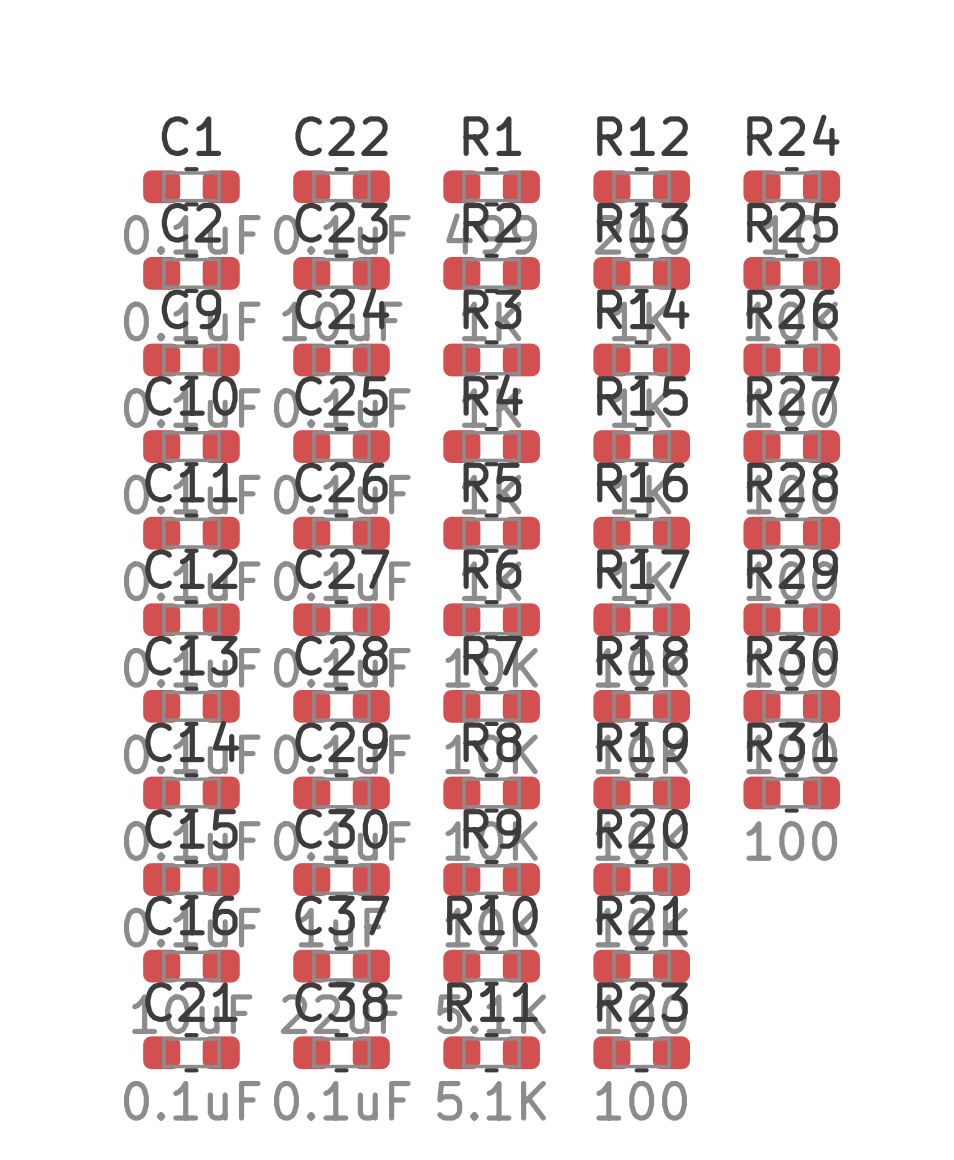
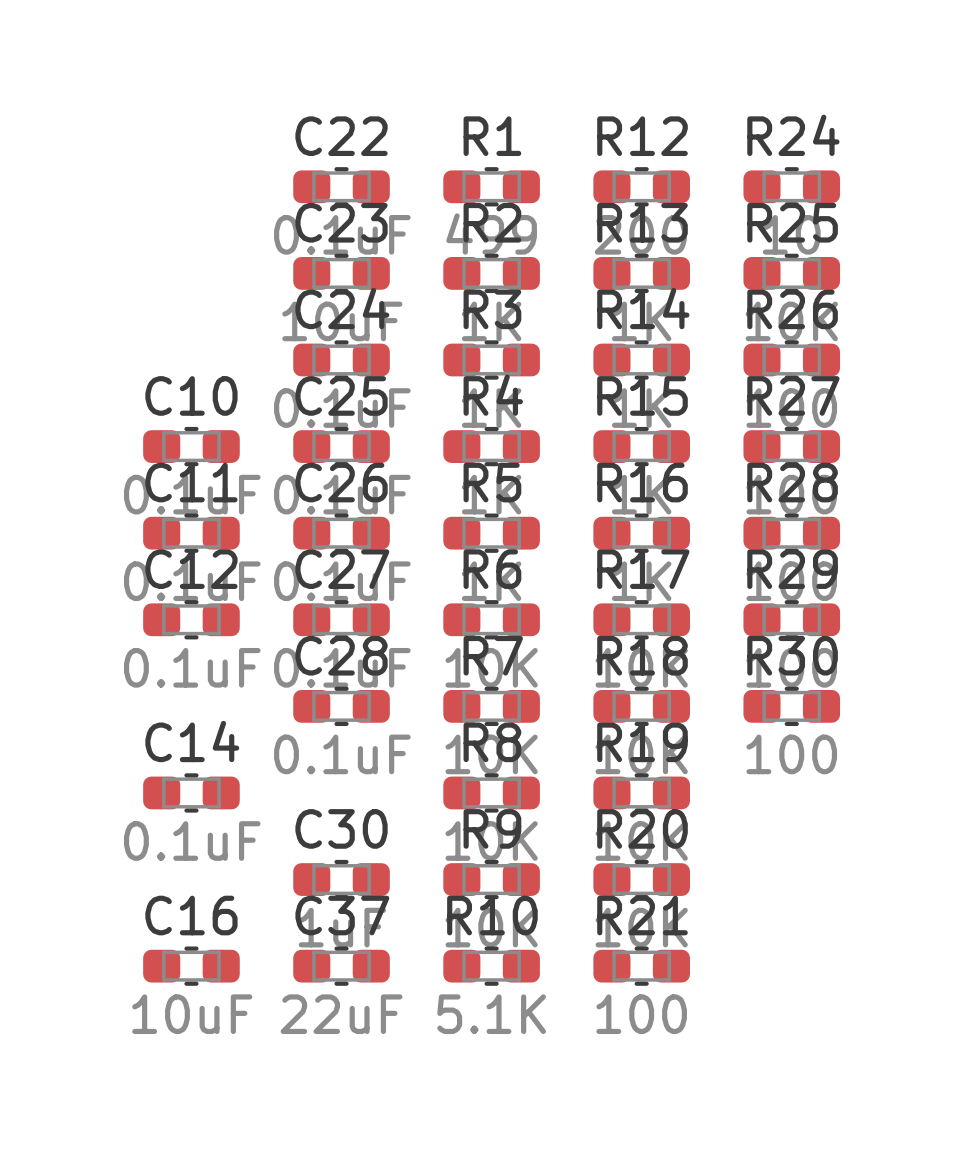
C1: 0.1uF (191, 186) -> none
C2: 0.1uF (191, 273) -> none
C9: 0.1uF (191, 359) -> none
C13: 0.1uF (191, 706) -> none
C29: 0.1uF (341, 792) -> none
R31: 100 (791, 792) -> none
C15: 0.1uF (191, 879) -> none
C21: 0.1uF (191, 1052) -> none
C38: 0.1uF (341, 1052) -> none
R11: 5.1K (491, 1052) -> none
R23: 100 (641, 1052) -> none

